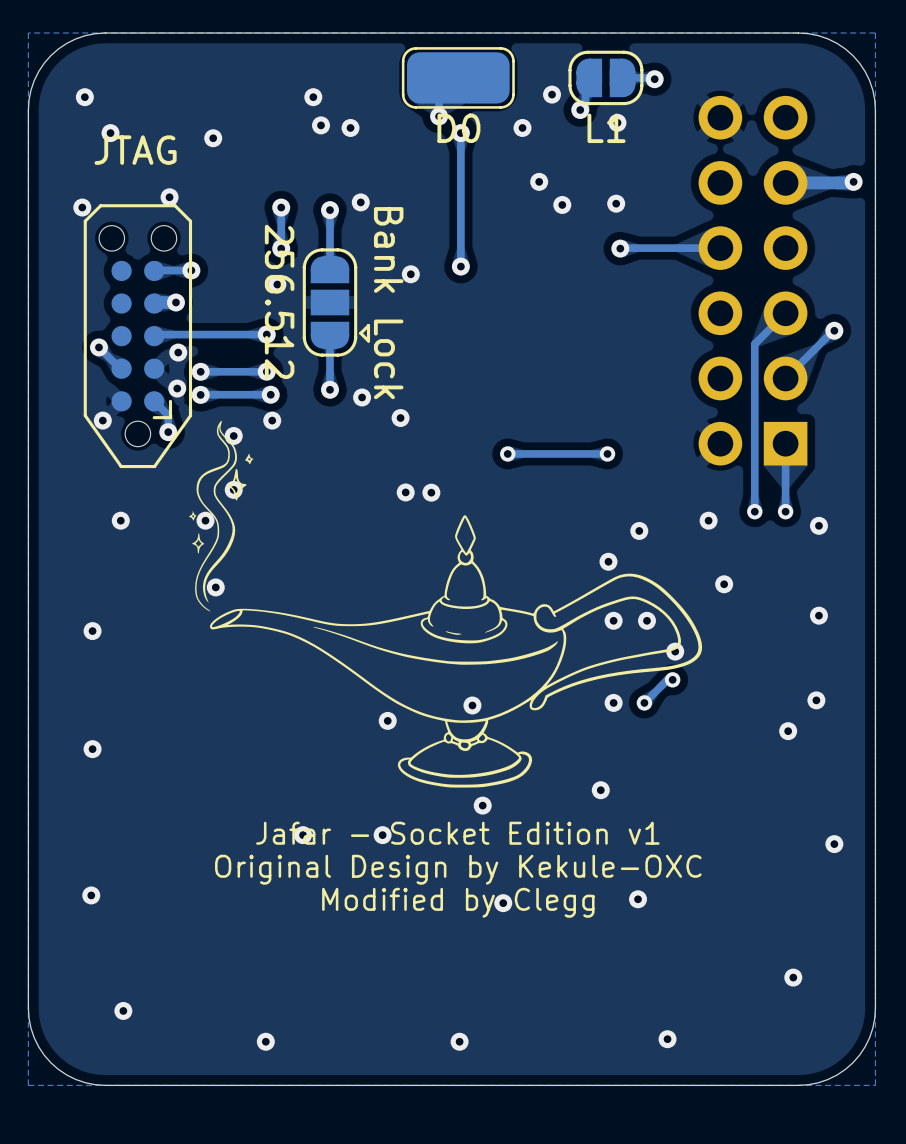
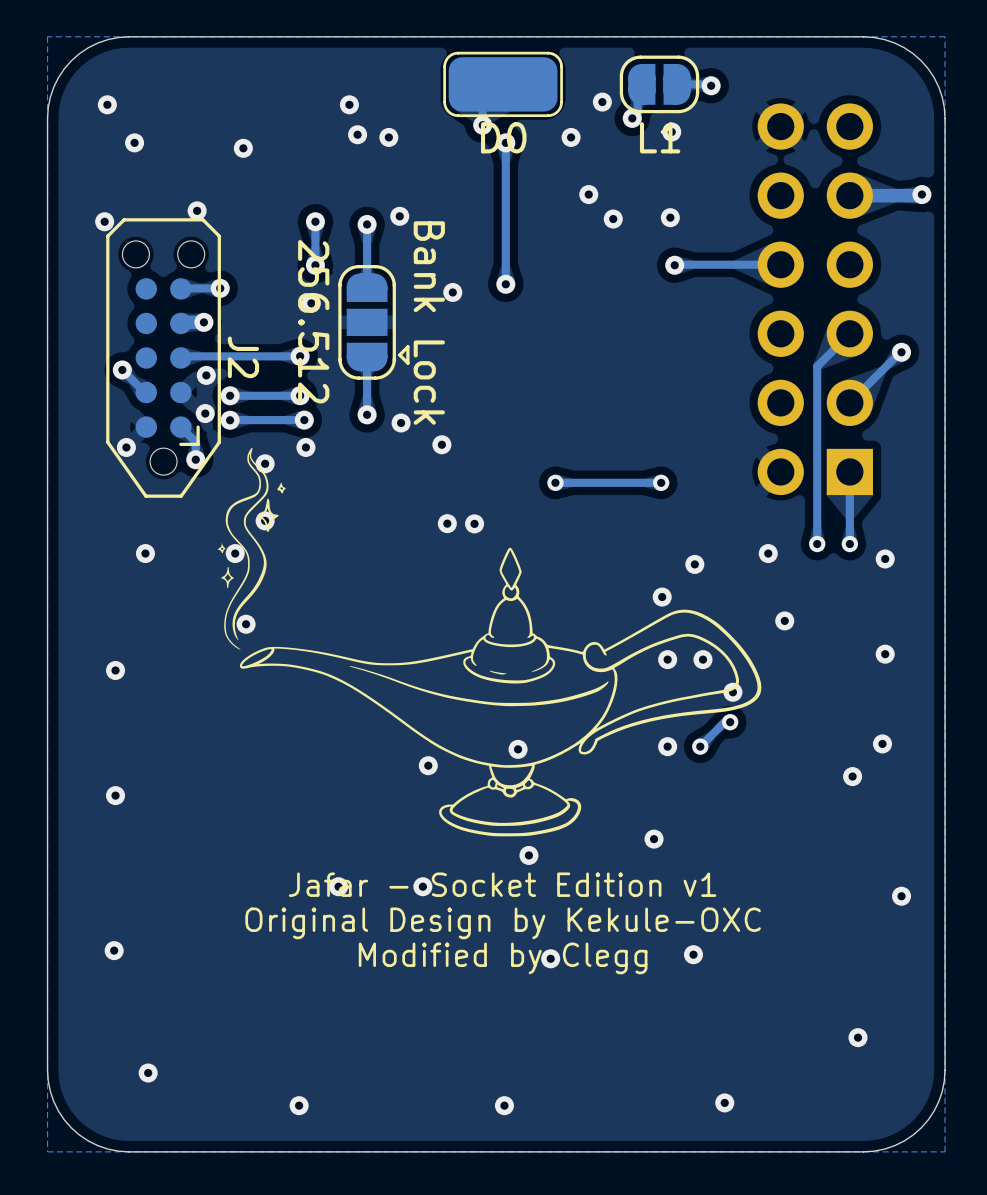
J2 value: JTAG (135, 150) -> none
J2 name: none -> J2 (243, 357)

